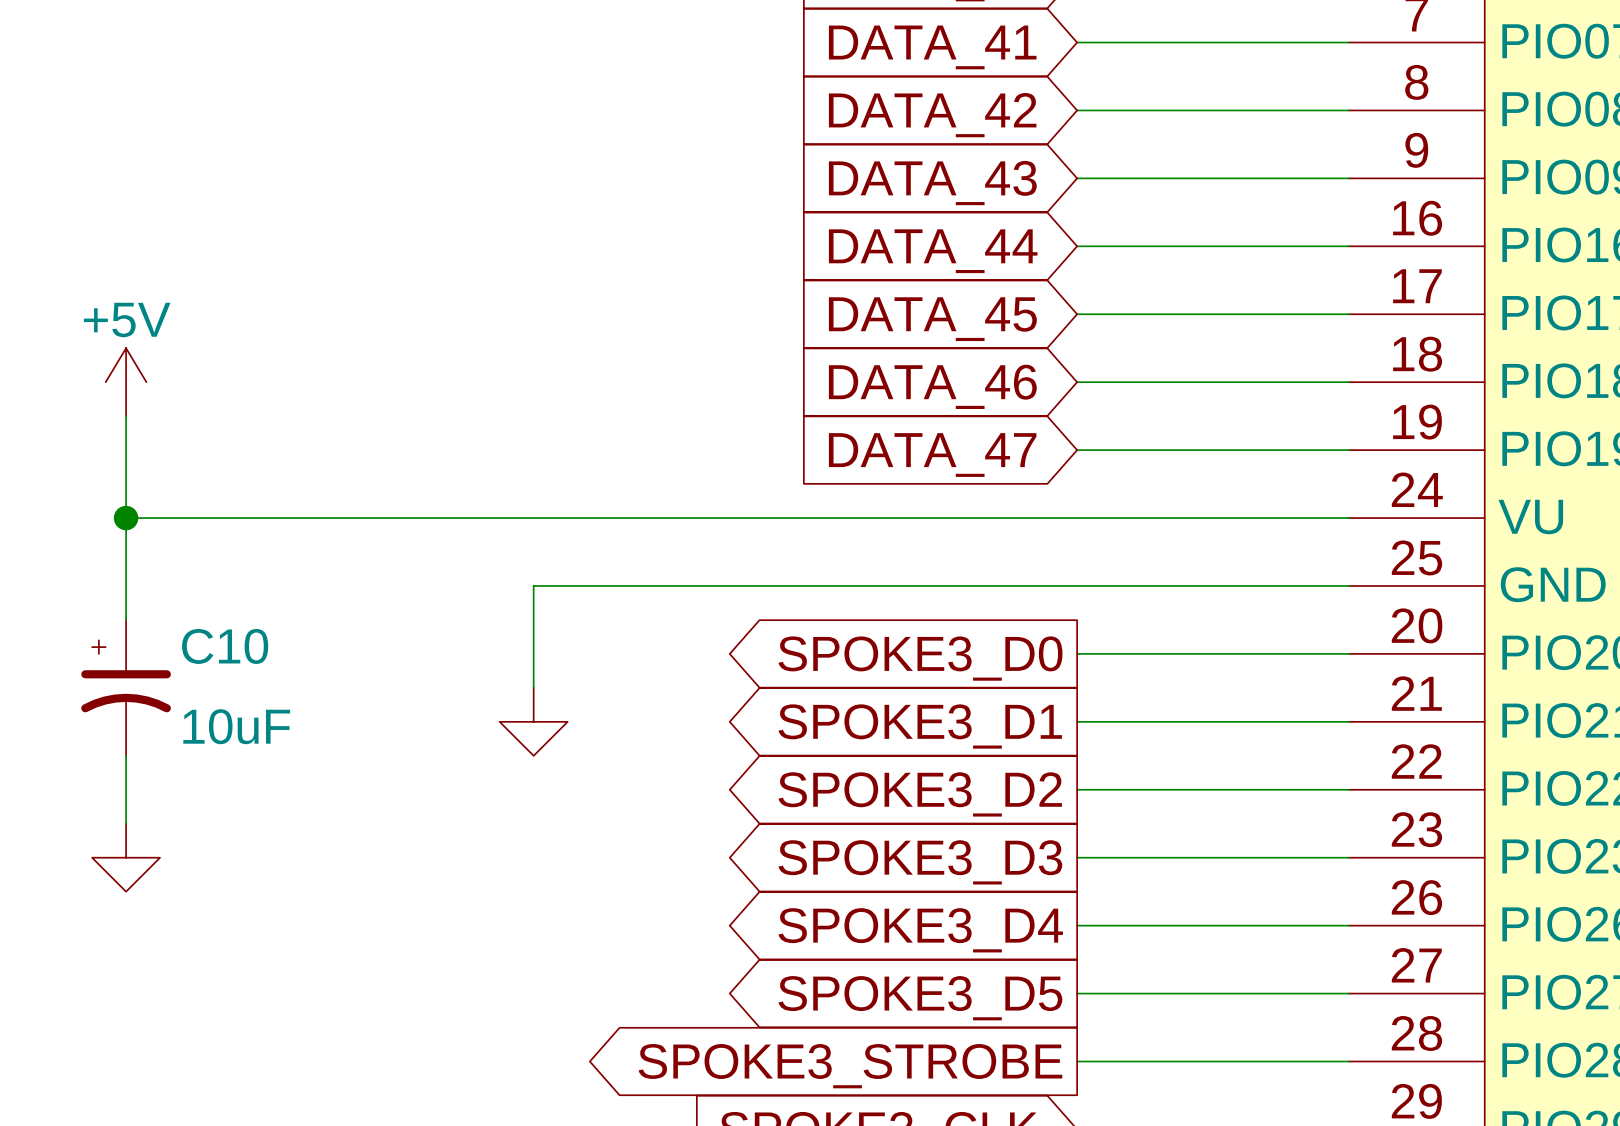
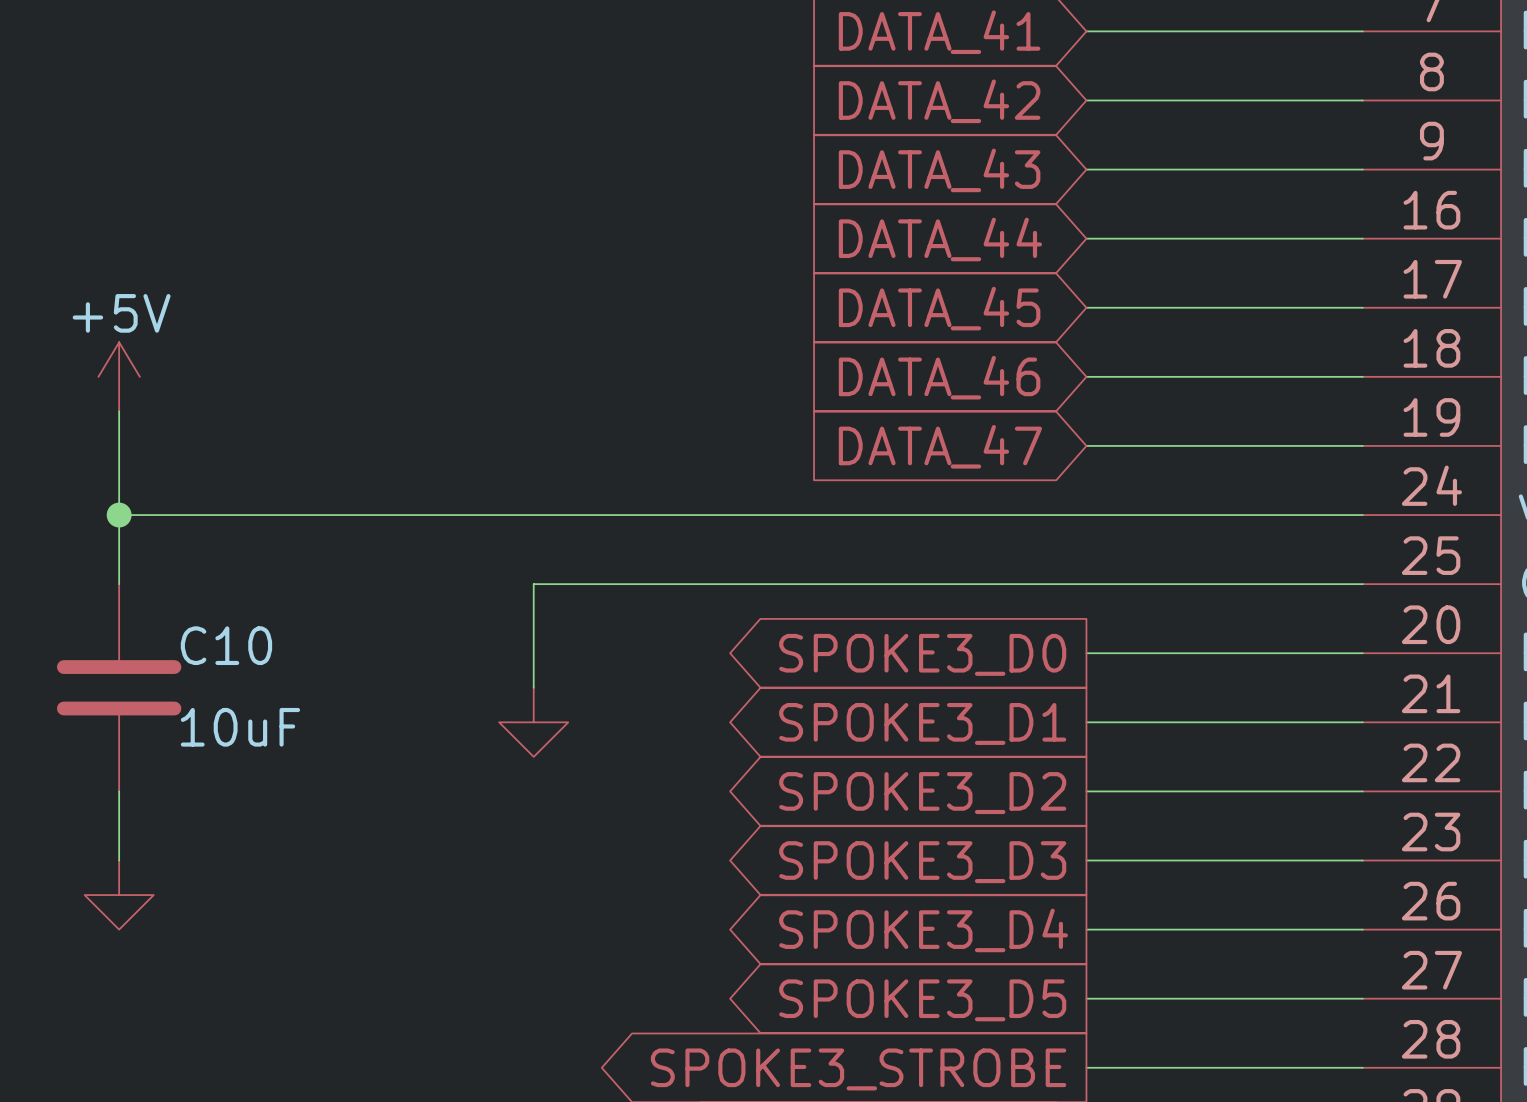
C10 symbol: [81, 619, 171, 756] -> [56, 584, 182, 792]
power symbol position: (126, 857) -> (119, 895)

